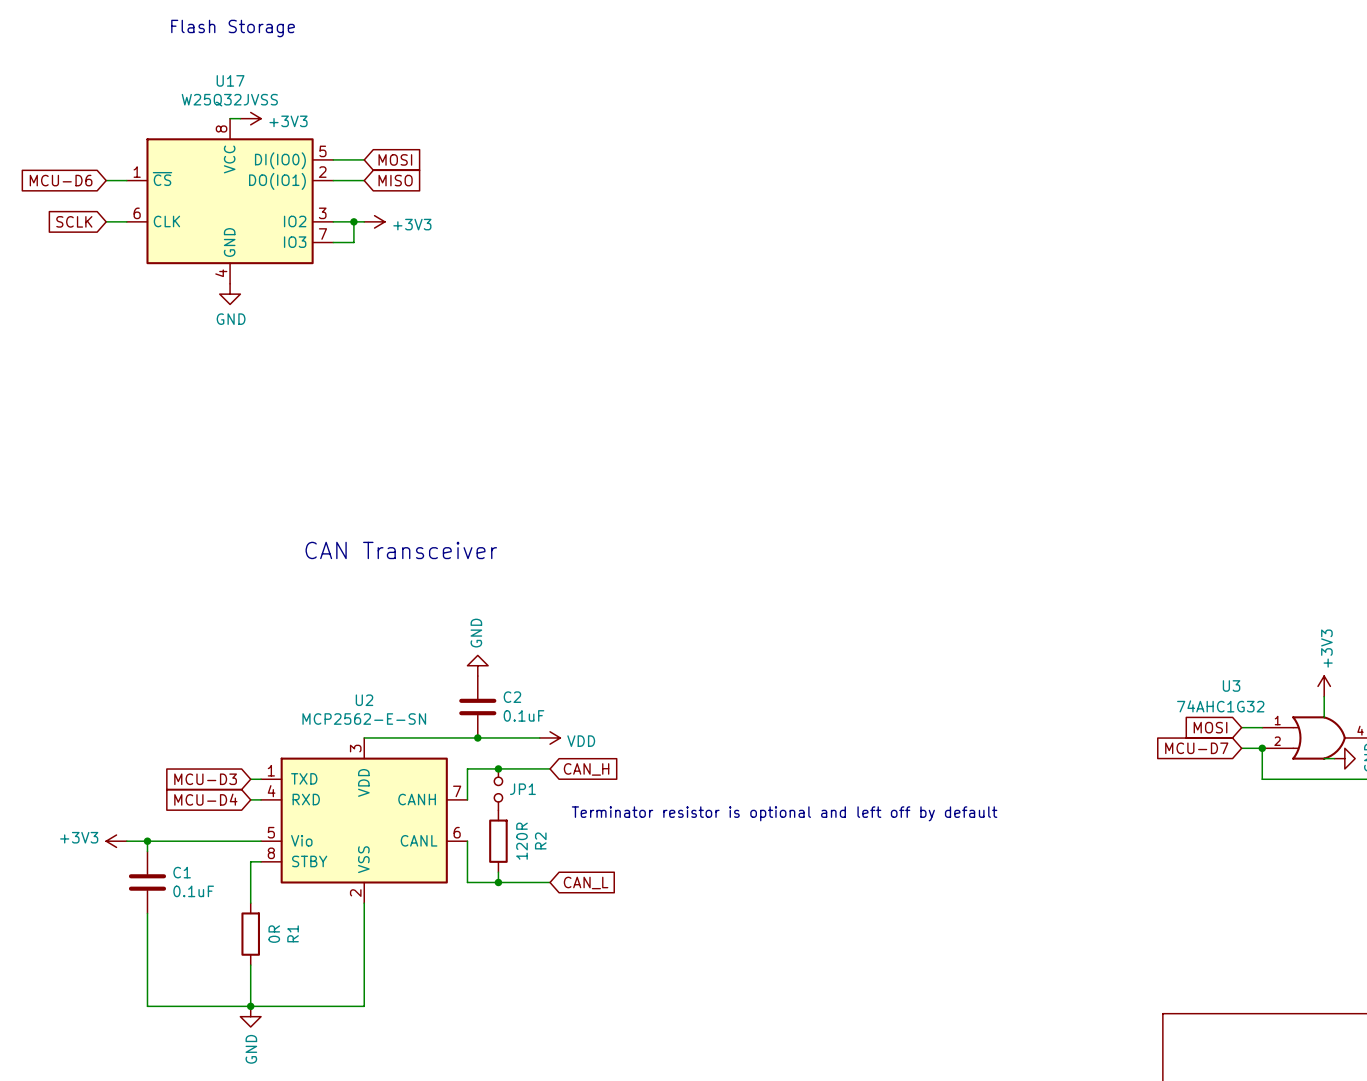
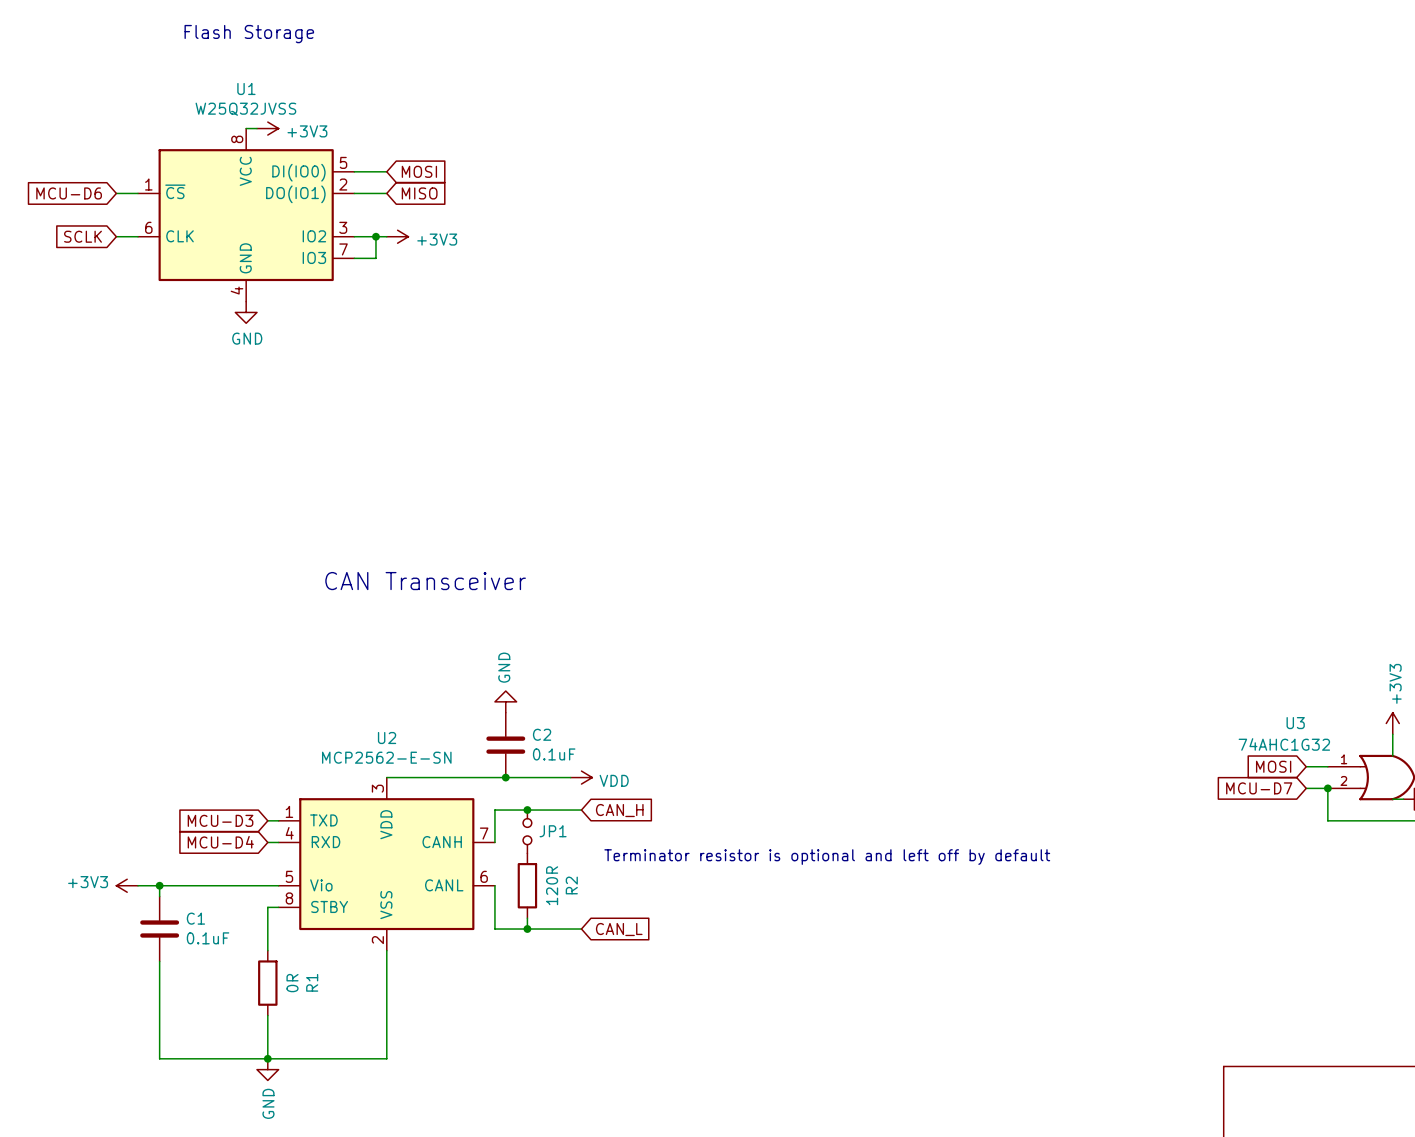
U17 name: U17 (230, 80) -> U1 (246, 88)

